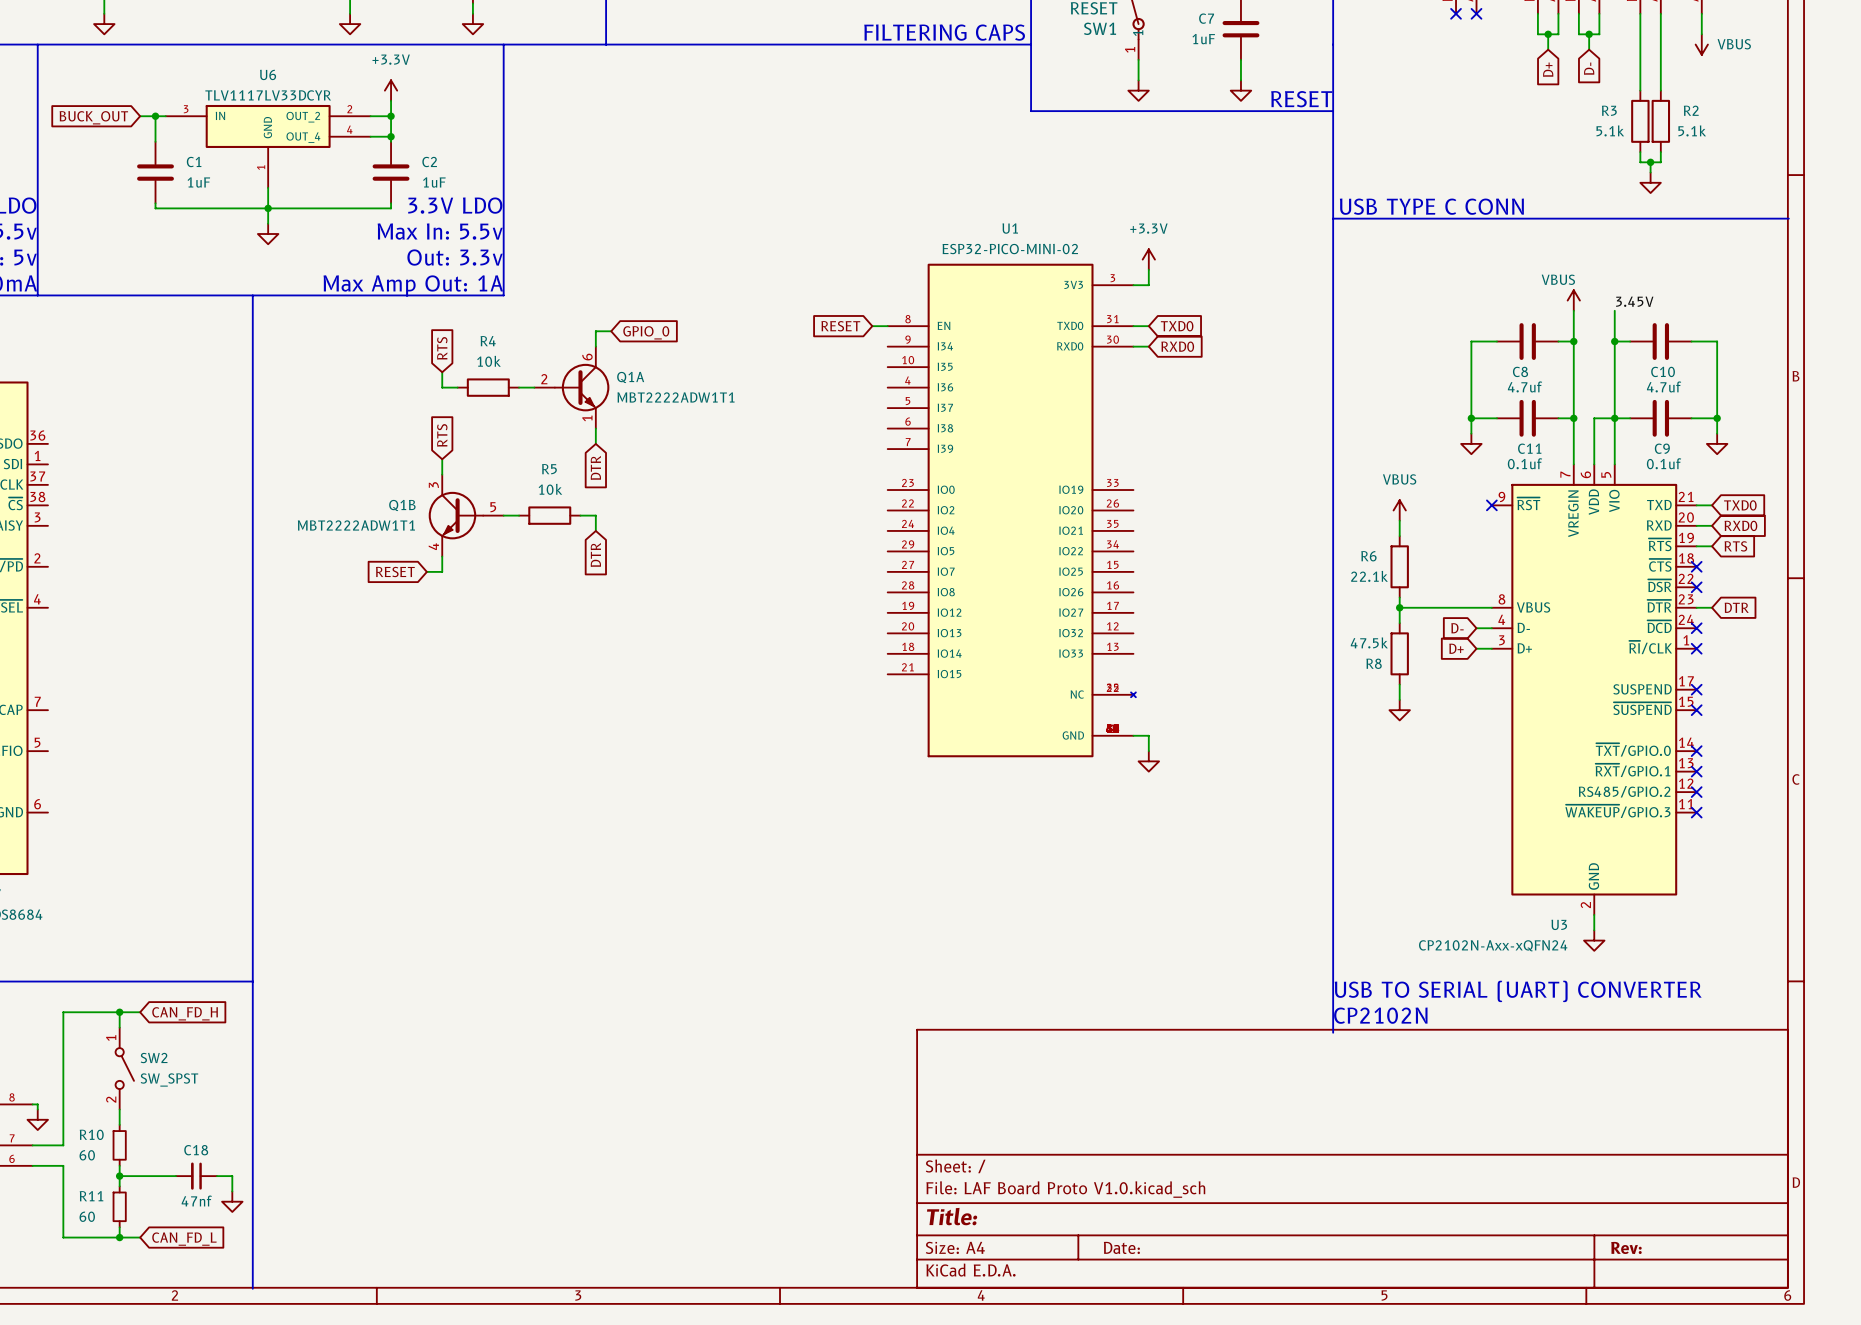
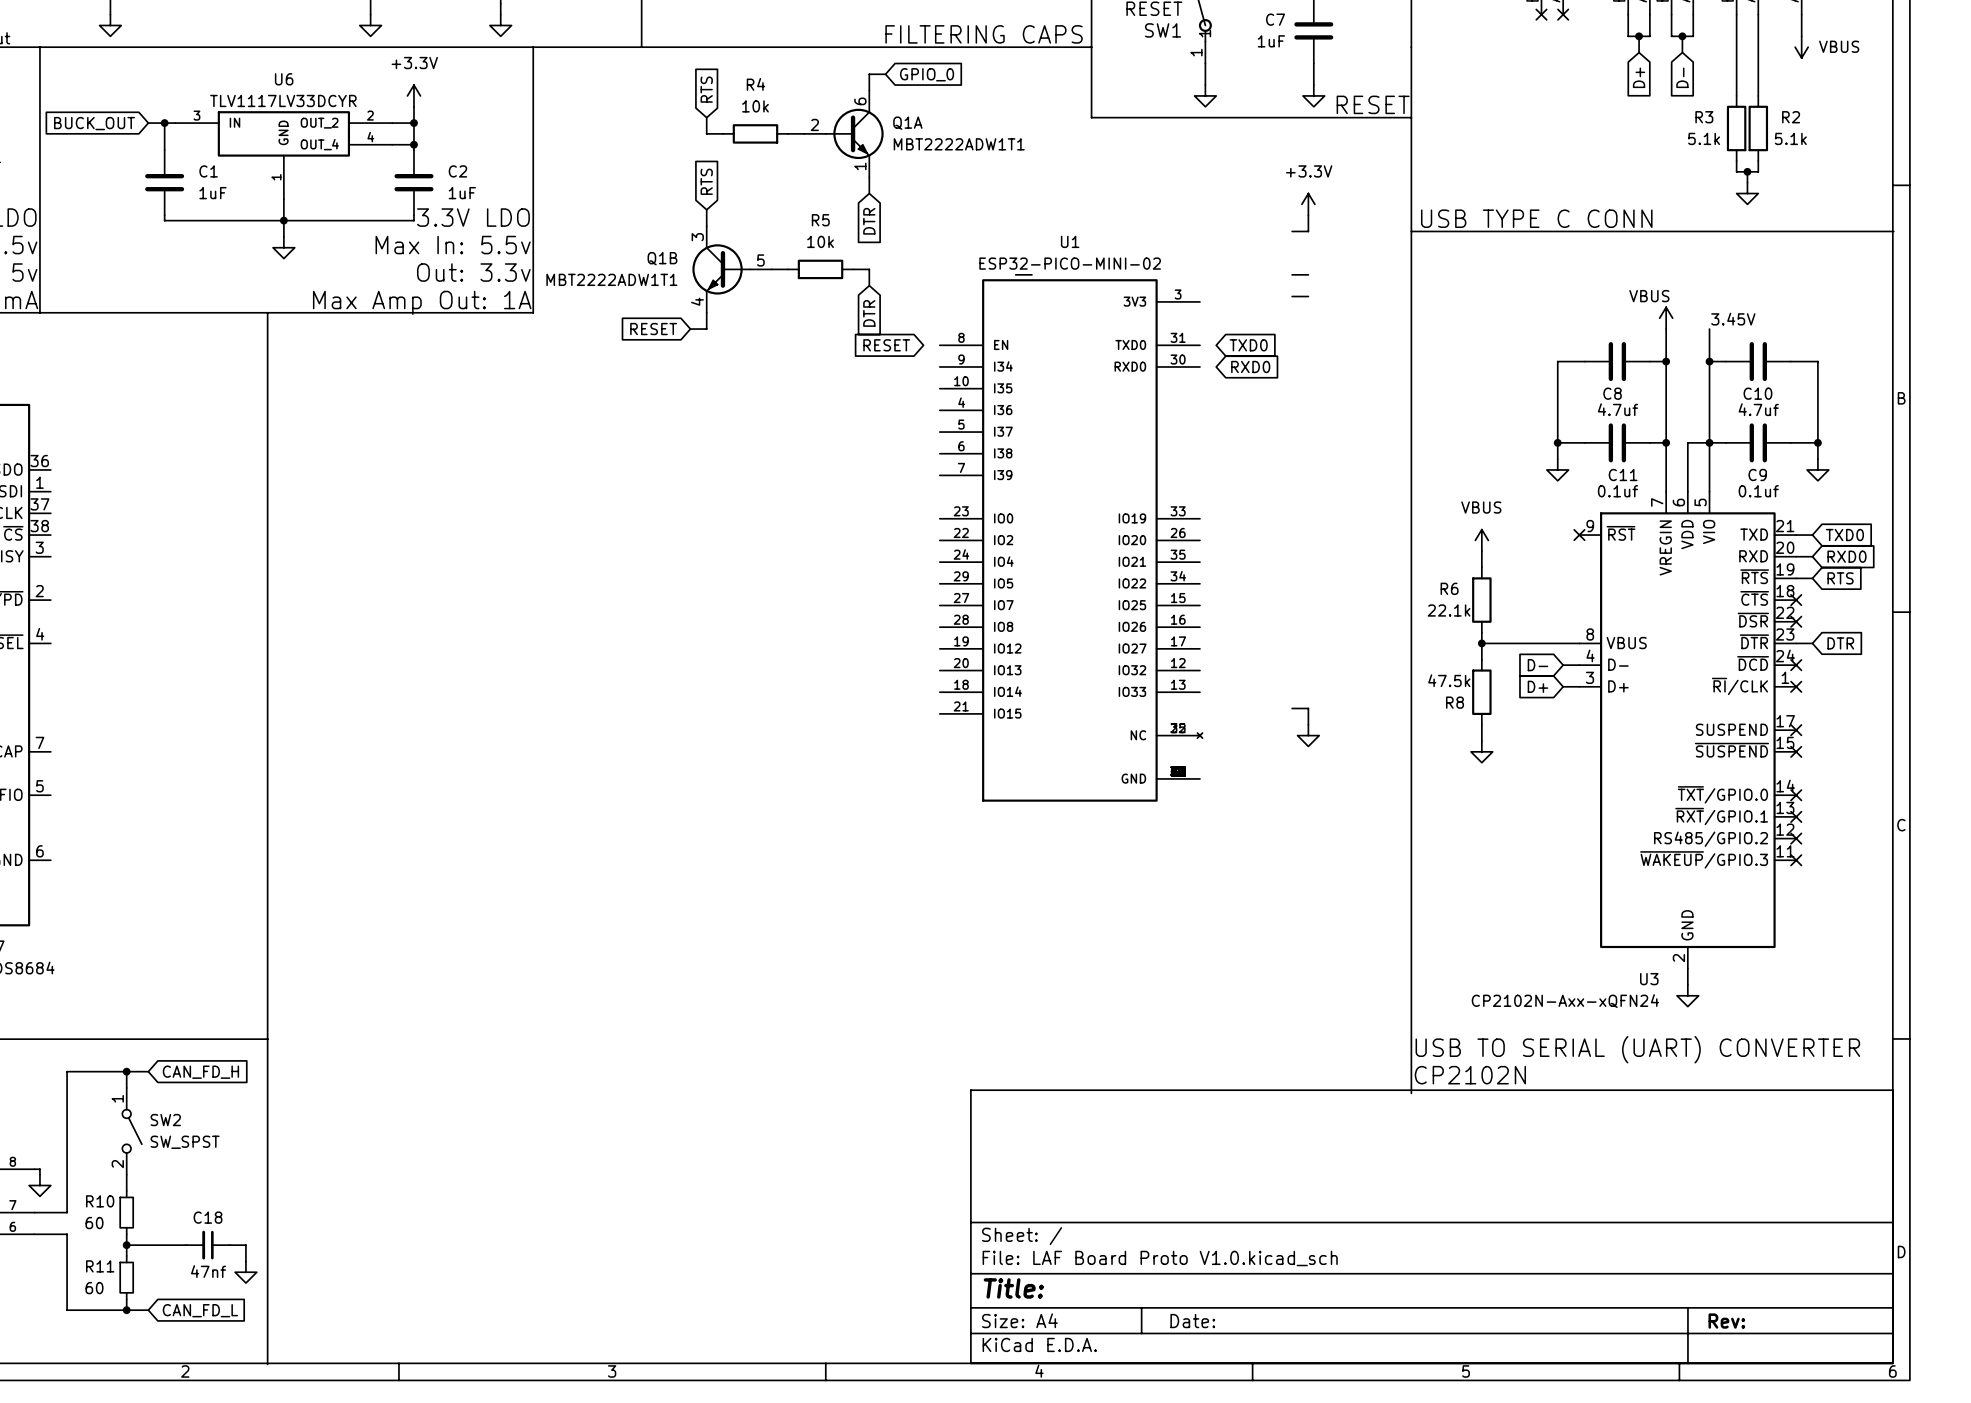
wire: none -> (885, 74) (869, 74) (869, 90)
global label: none -> GPIO_0 (927, 74)
global label: none -> RTS (706, 89)
wire: none -> (706, 117) (706, 133) (722, 133)
wire: none -> (788, 133) (804, 133)
wire: none -> (869, 177) (869, 193)
global label: none -> RTS (706, 181)
wire: none -> (706, 209) (706, 226)
global label: none -> DTR (869, 221)
wire: none -> (771, 269) (788, 269)
wire: none -> (853, 269) (869, 269) (869, 285)
power symbol position: +3.3V (1148, 259) -> +3.3V (1308, 204)
wire: (1148, 269) (1148, 285) (1133, 285) -> (1308, 215) (1308, 231) (1292, 231)
global label: none -> DTR (869, 313)
wire: none -> (706, 312) (706, 329) (690, 329)
global label: none -> RESET (653, 329)
wire: (872, 326) (887, 326) -> (1015, 274) (1031, 274)
wire: (1133, 326) (1148, 326) -> (1292, 274) (1308, 274)
wire: (611, 331) (595, 331) (595, 346) -> none
global label: GPIO_0 (646, 332) -> none
wire: (1133, 346) (1148, 346) -> (1292, 296) (1308, 296)
global label: RTS (442, 348) -> none
wire: (442, 372) (442, 387) (457, 387) -> none
R4 position: (488, 387) -> (755, 133)
wire: (519, 387) (534, 387) -> none
Q1A position: (571, 387) -> (843, 133)
wire: (595, 428) (595, 443) -> none
global label: RTS (442, 435) -> none
wire: (442, 459) (442, 474) -> none
global label: DTR (595, 467) -> none
Q1B position: (466, 515) -> (732, 269)
wire: (503, 515) (519, 515) -> none
R5 position: (549, 515) -> (820, 269)
wire: (580, 515) (595, 515) (595, 530) -> none
global label: DTR (595, 554) -> none
wire: (442, 556) (442, 571) (426, 571) -> none
global label: RESET (395, 572) -> none
wire: (1133, 735) (1148, 735) (1148, 751) -> (1292, 708) (1308, 708) (1308, 724)
power symbol position: (1148, 761) -> (1308, 735)

